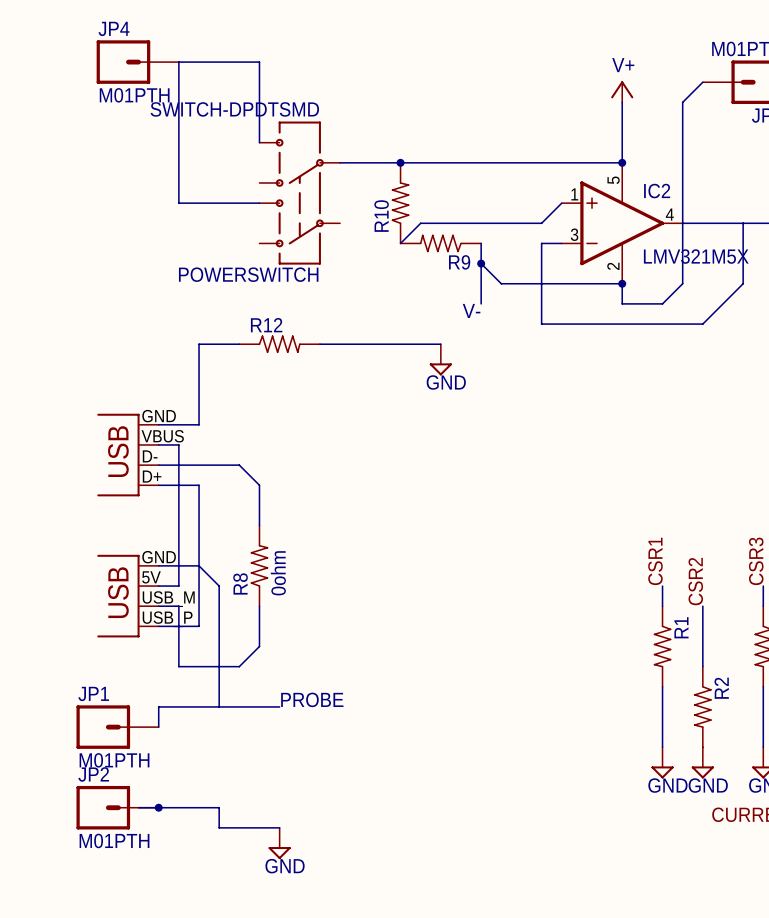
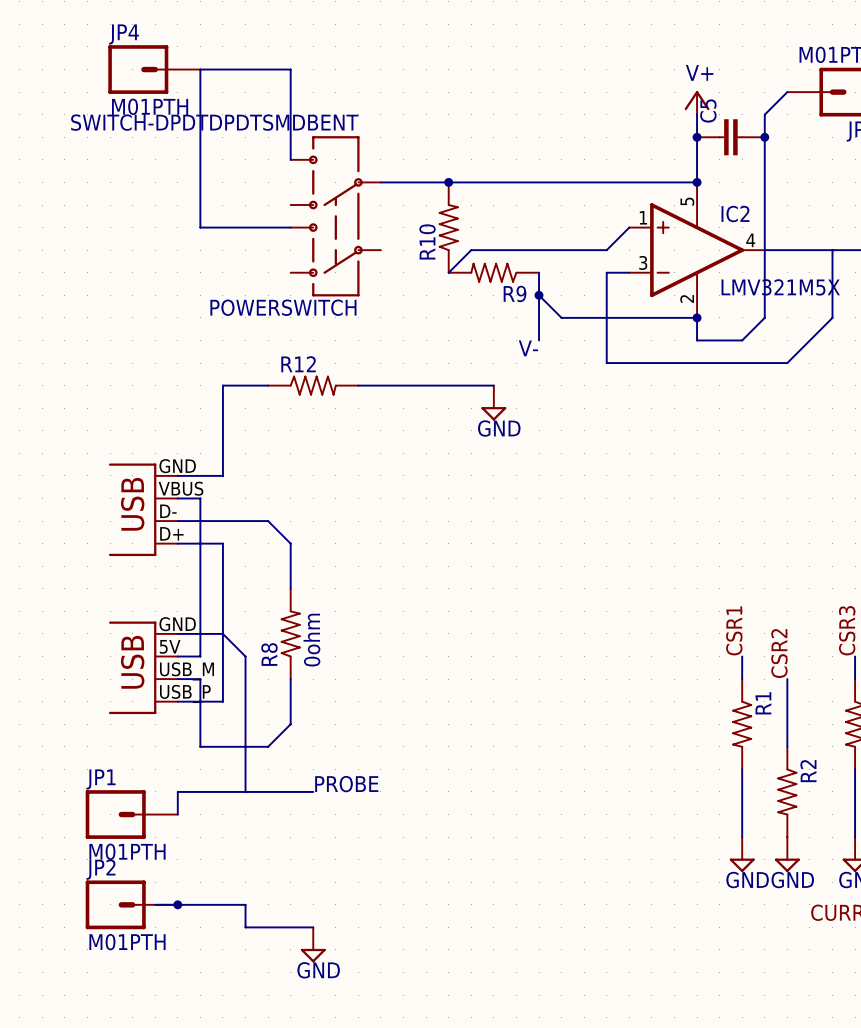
POWERSWITCH value: SWITCH-DPDTSMD (234, 109) -> SWITCH-DPDTDPDTSMDBENT (214, 122)
junction: none -> (697, 137)
C5: none -> (730, 137)
junction: none -> (764, 137)

